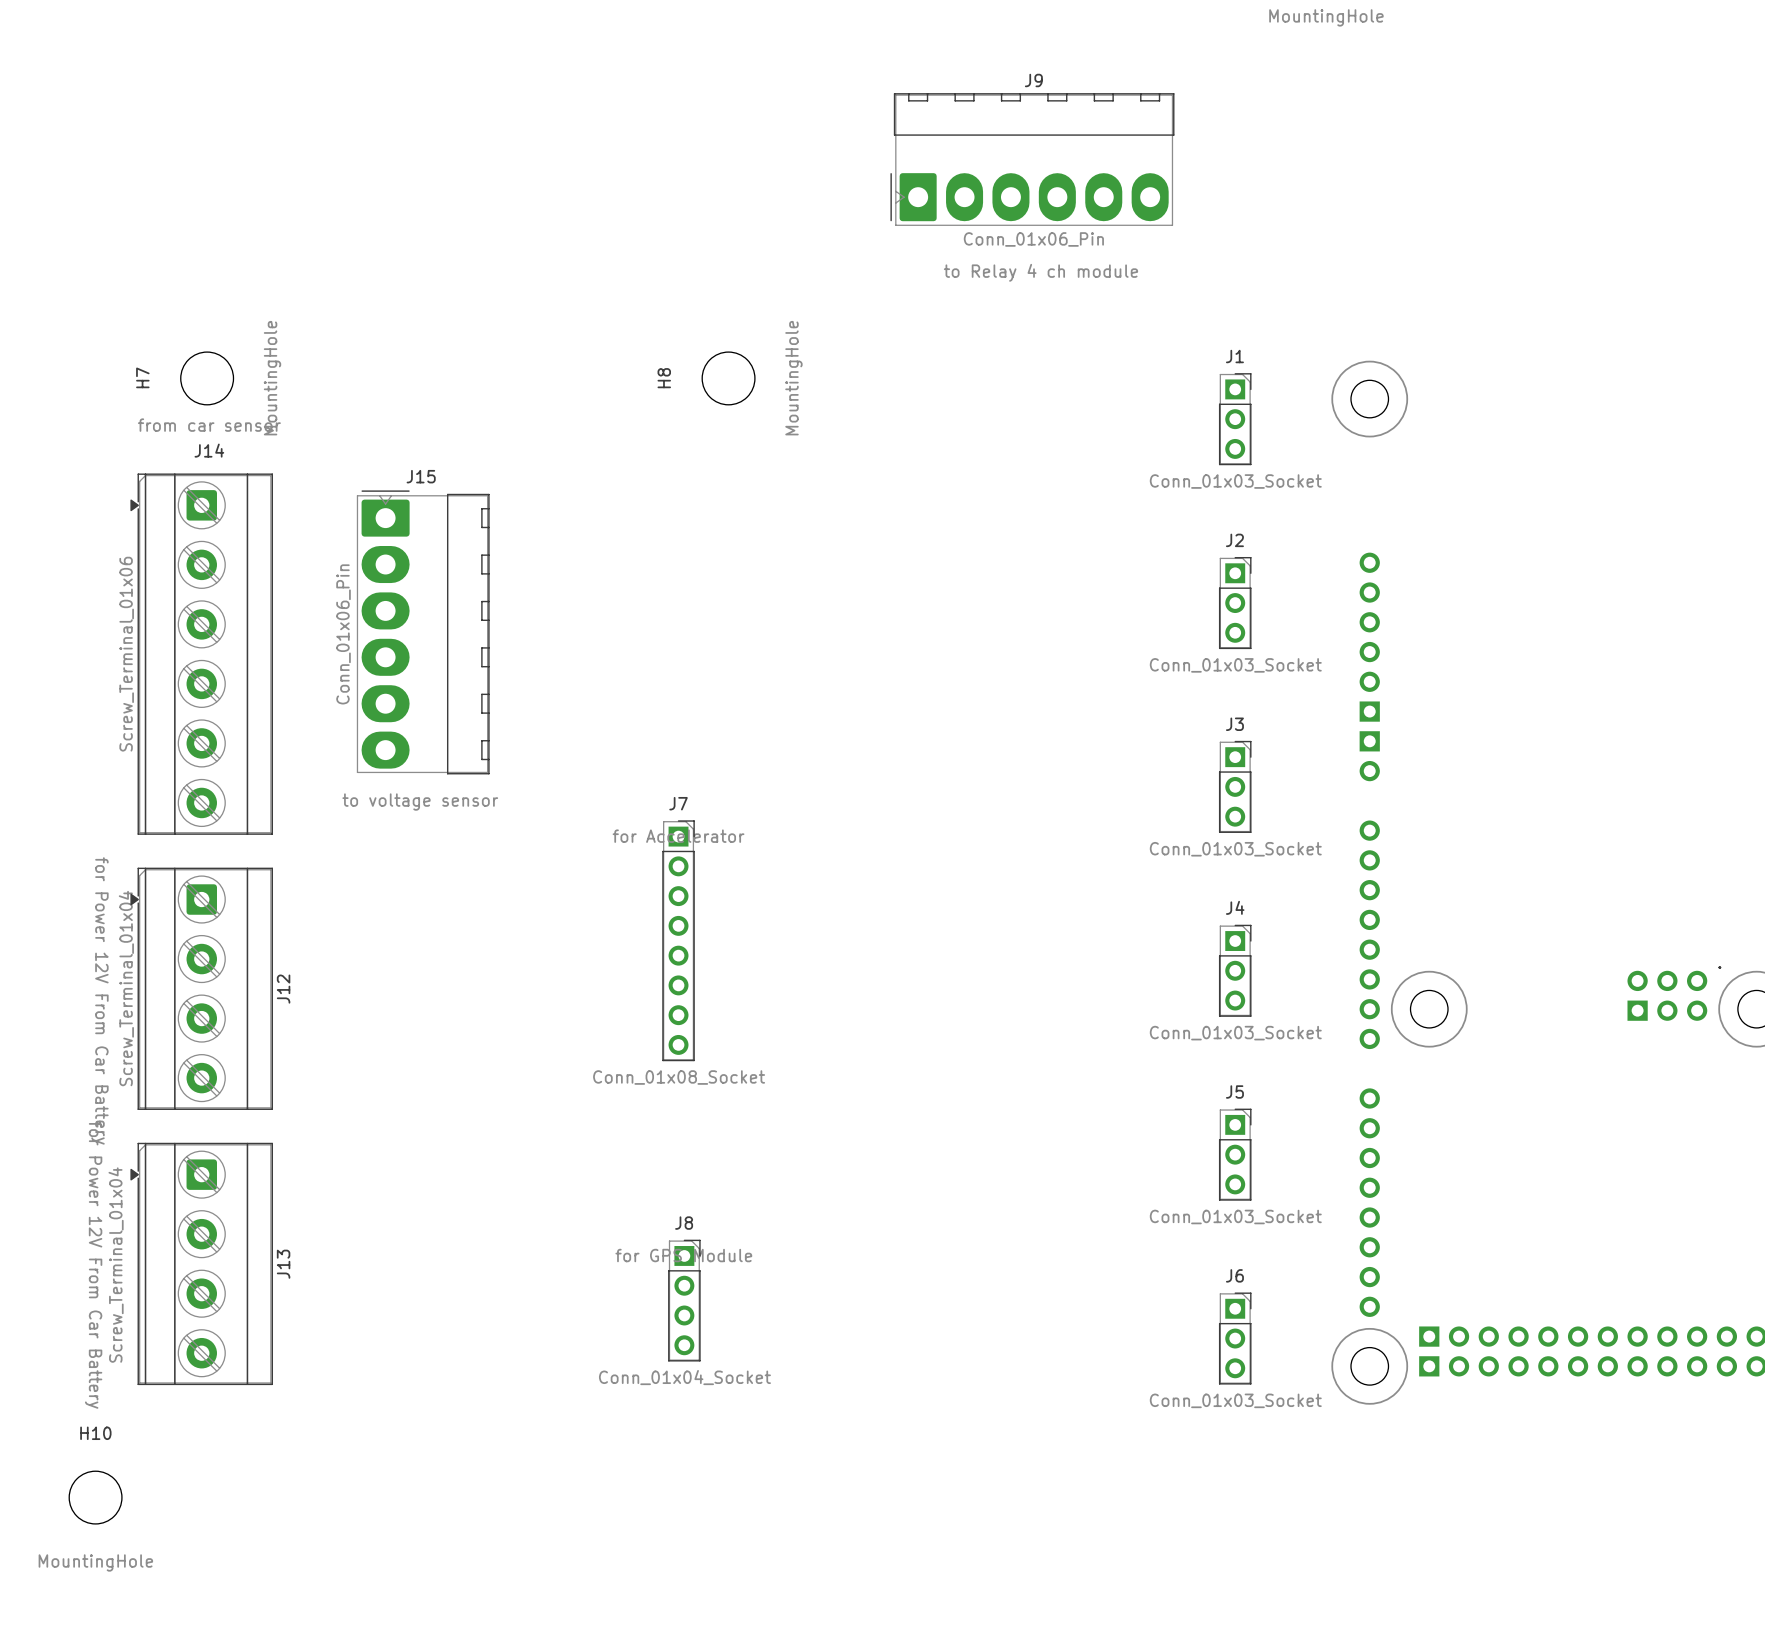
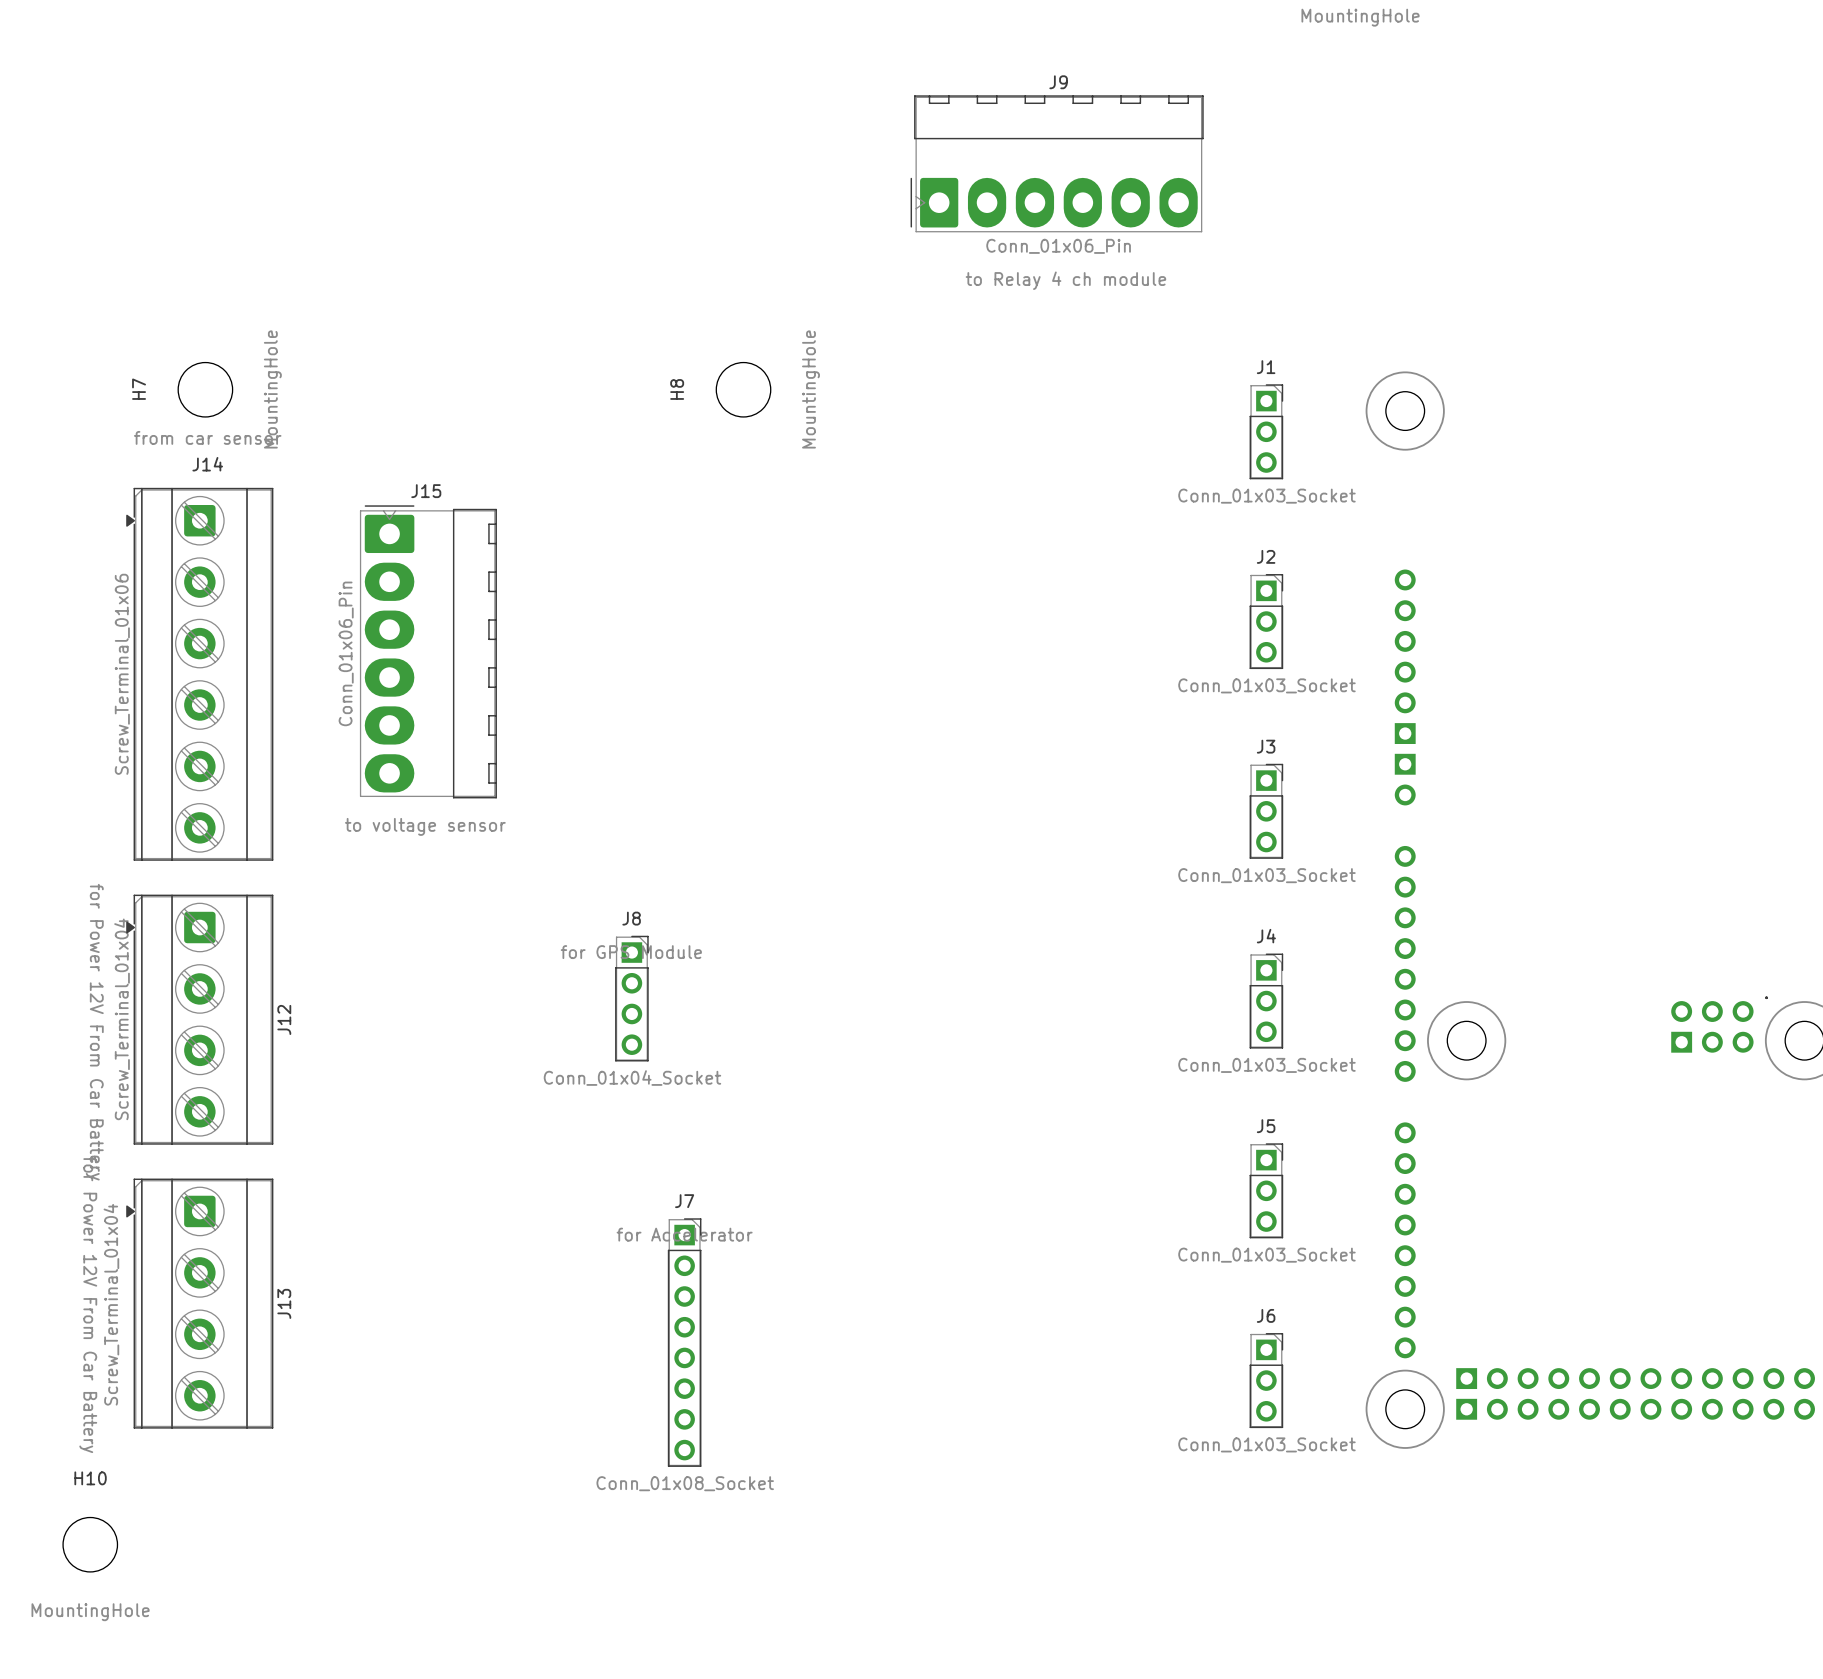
J7 position: (678, 940) -> (684, 1342)
J8 position: (684, 1300) -> (631, 998)

